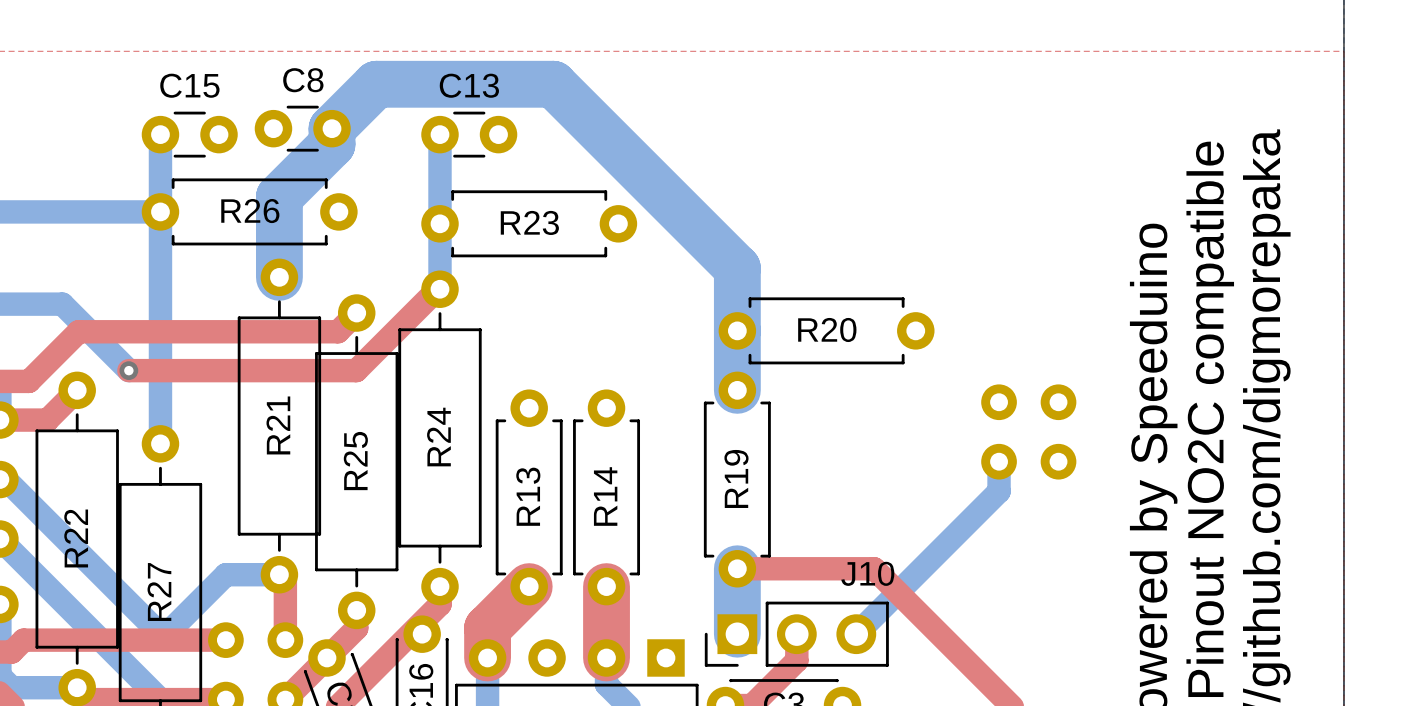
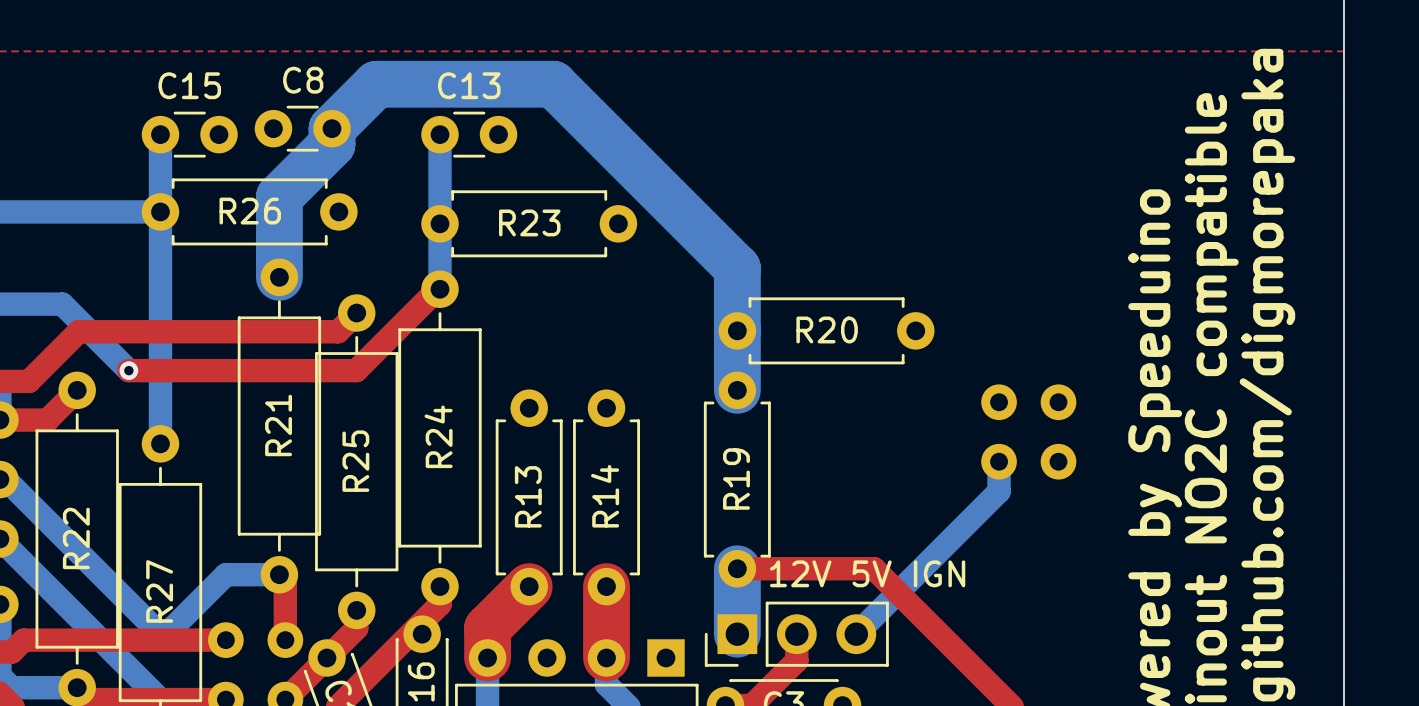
J10 name: J10 (867, 573) -> 12V 5V IGN (867, 573)

